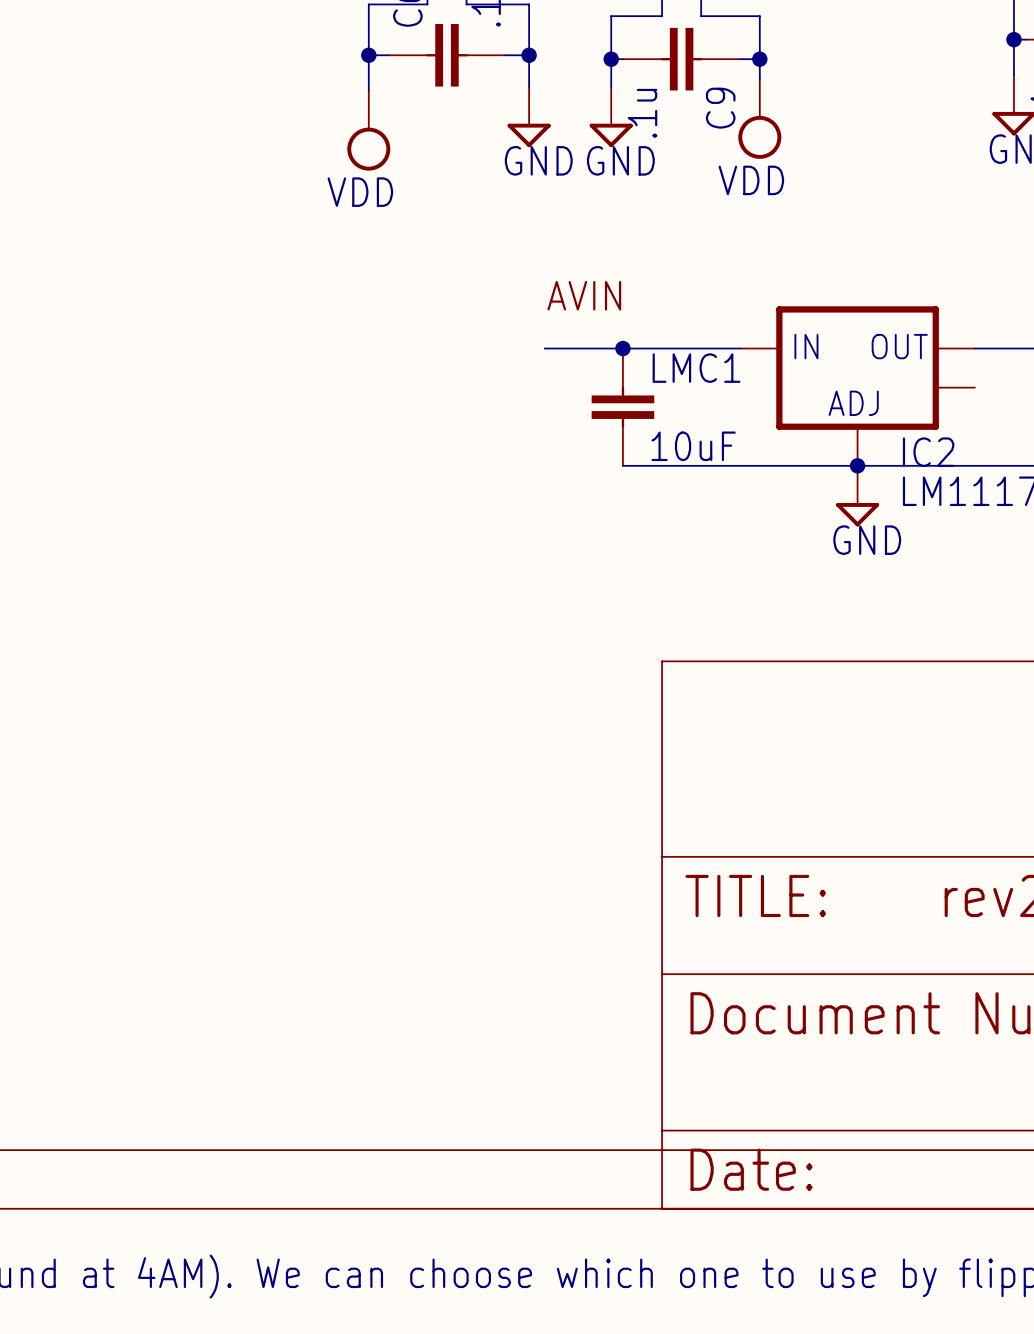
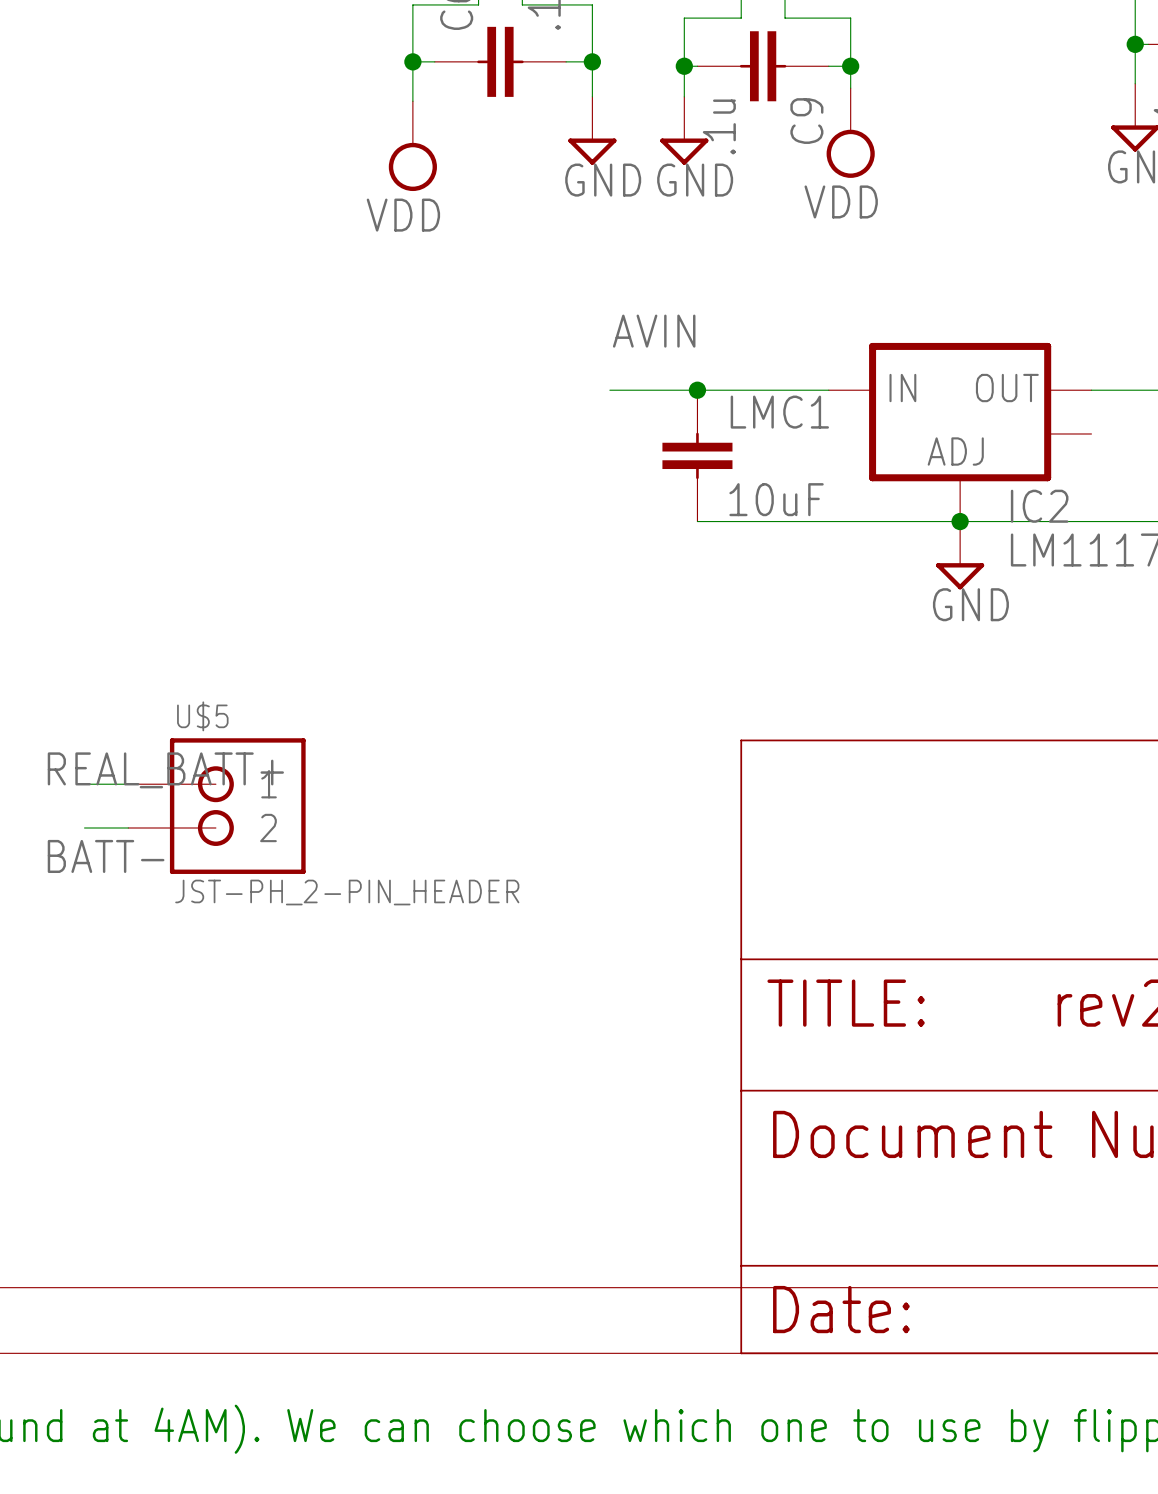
label: none -> REAL_BATT+ (165, 770)
wire: none -> (84, 784) (128, 784)
U$5: none -> JST-PH_2-PIN_HEADER (216, 806)
wire: none -> (84, 827) (128, 827)
label: none -> BATT- (106, 856)

